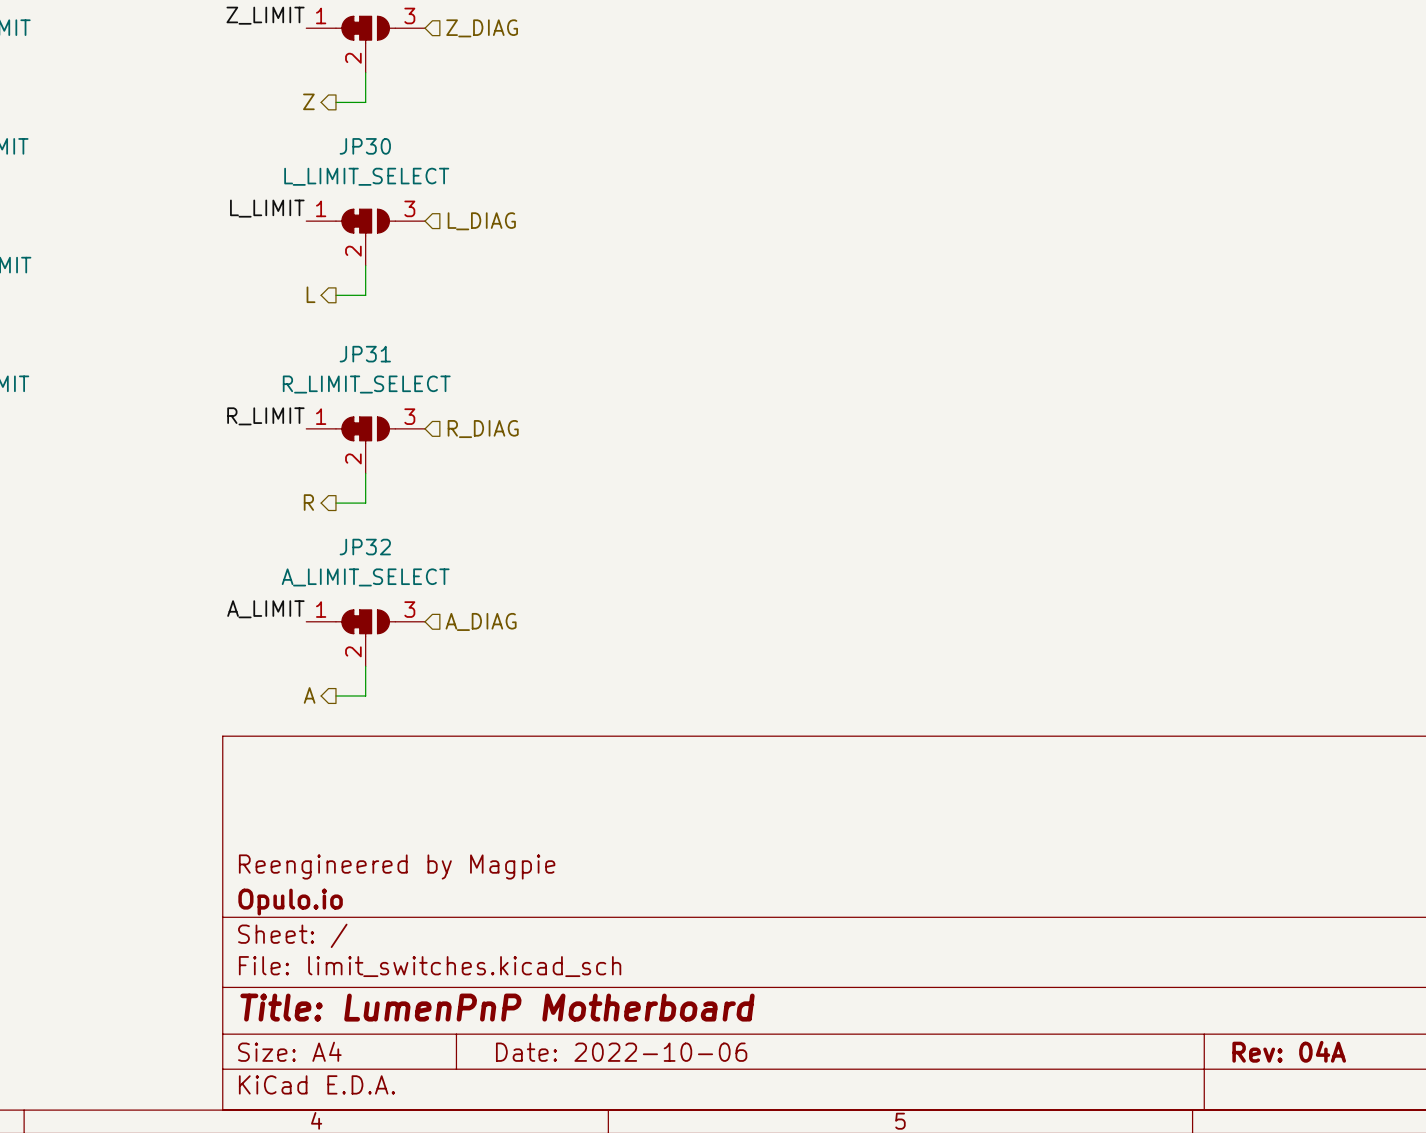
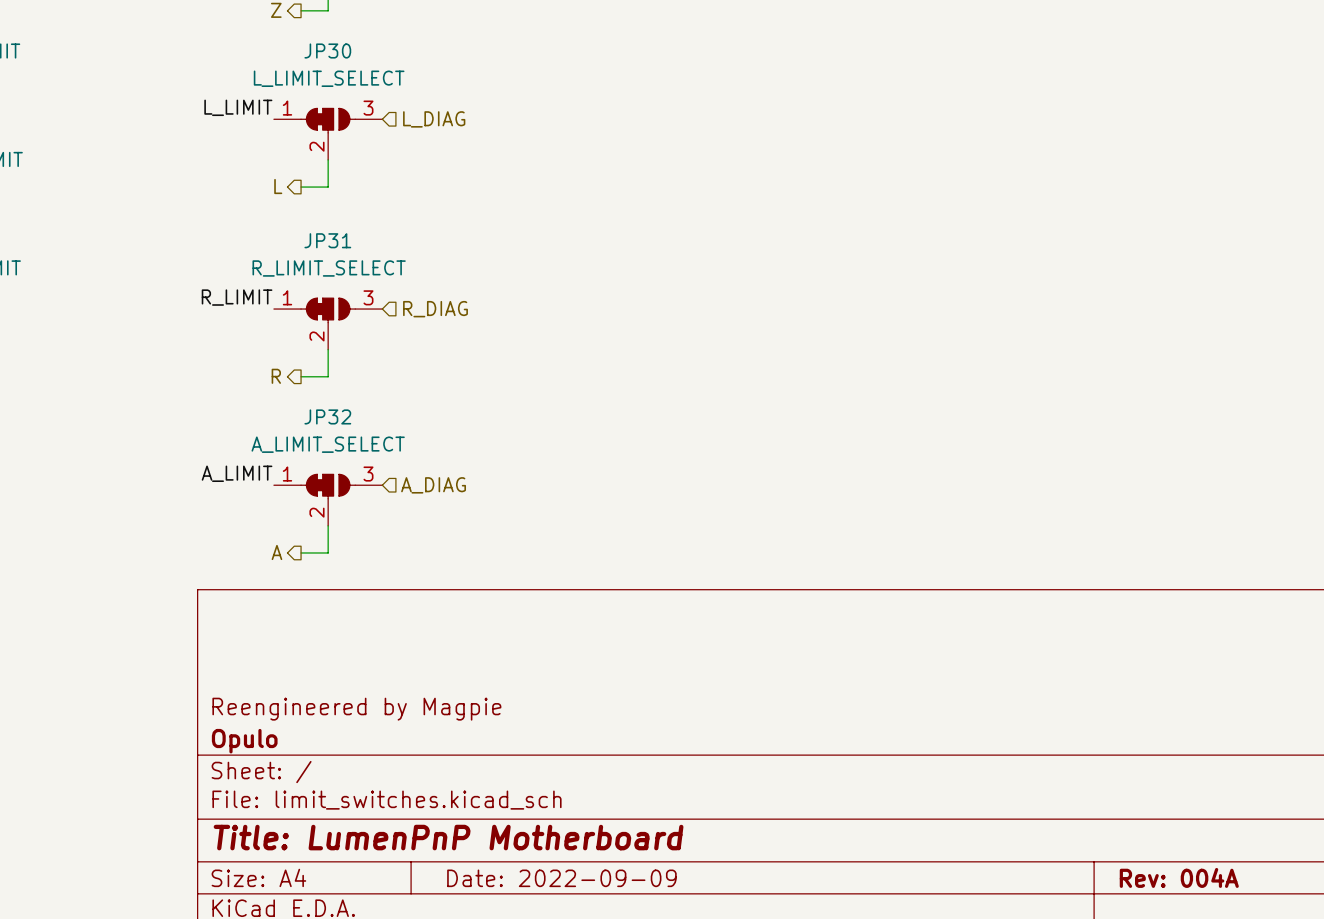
title block: Opulo.io (290, 902) -> Opulo (244, 741)
title block: Rev: 04A (1289, 1051) -> Rev: 004A (1179, 877)
title block: Date: 2022-10-06 (621, 1052) -> Date: 2022-09-09 (561, 878)

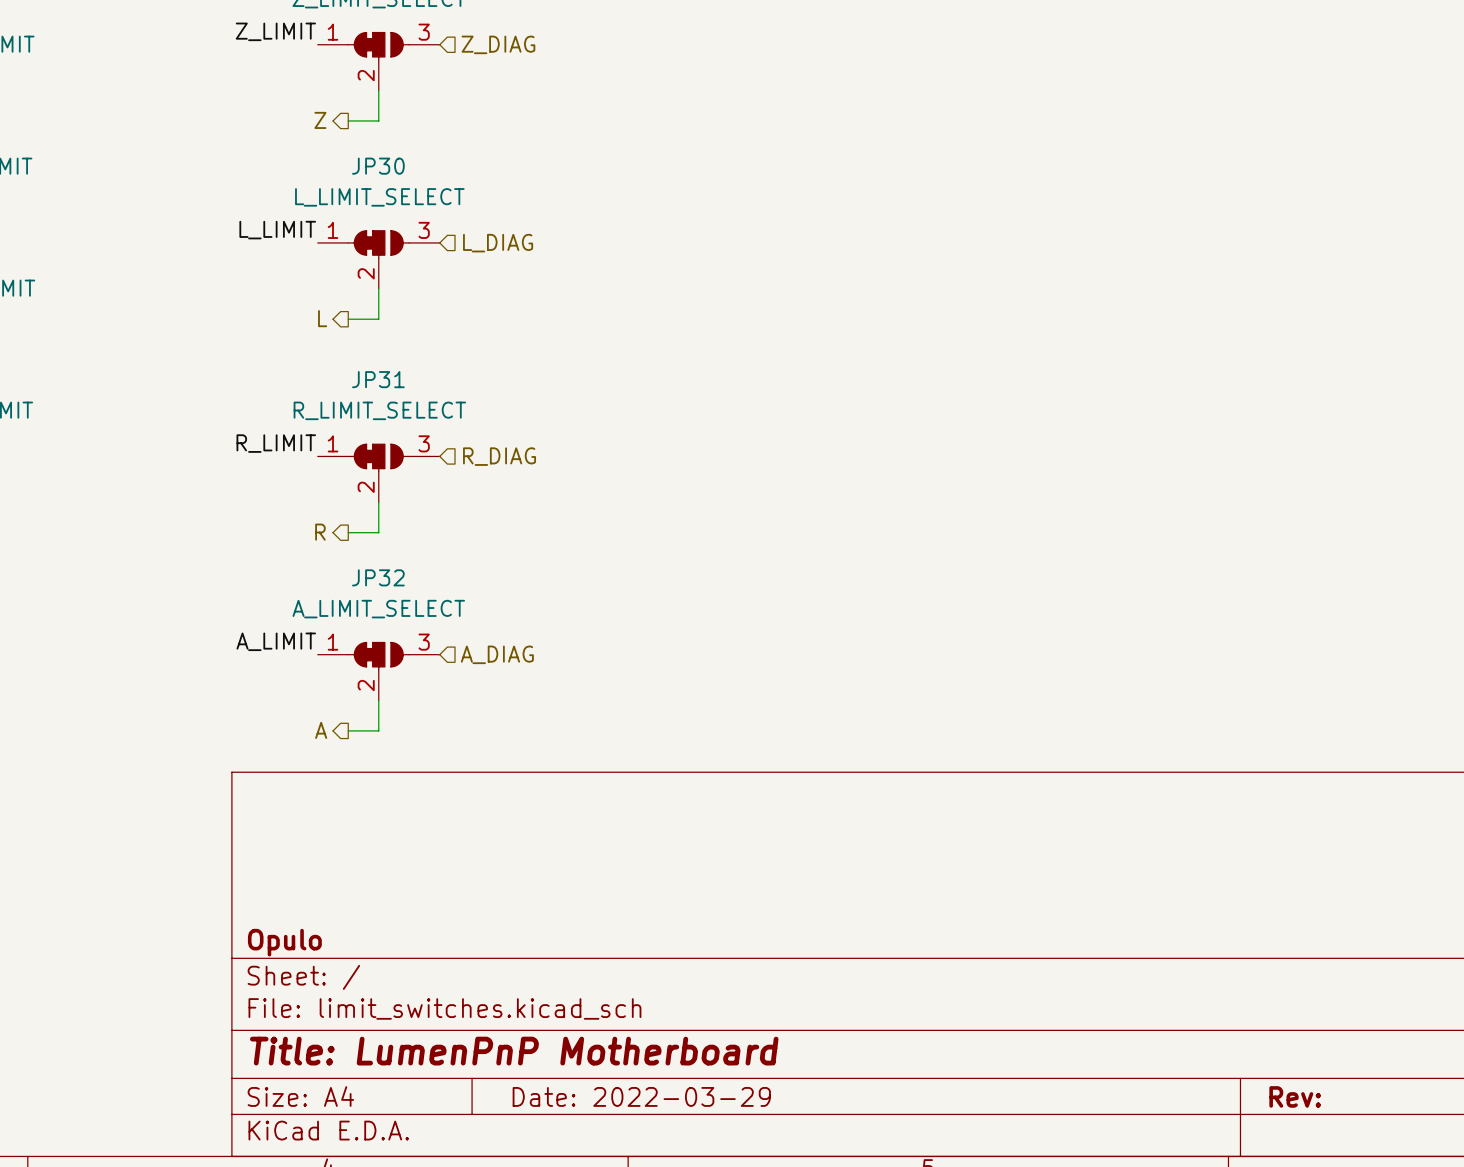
title block: Reengineered by Magpie (356, 709) -> none
title block: Rev: 004A (1179, 877) -> Rev: (1295, 1096)
title block: Date: 2022-09-09 (561, 878) -> Date: 2022-03-29 (641, 1096)

